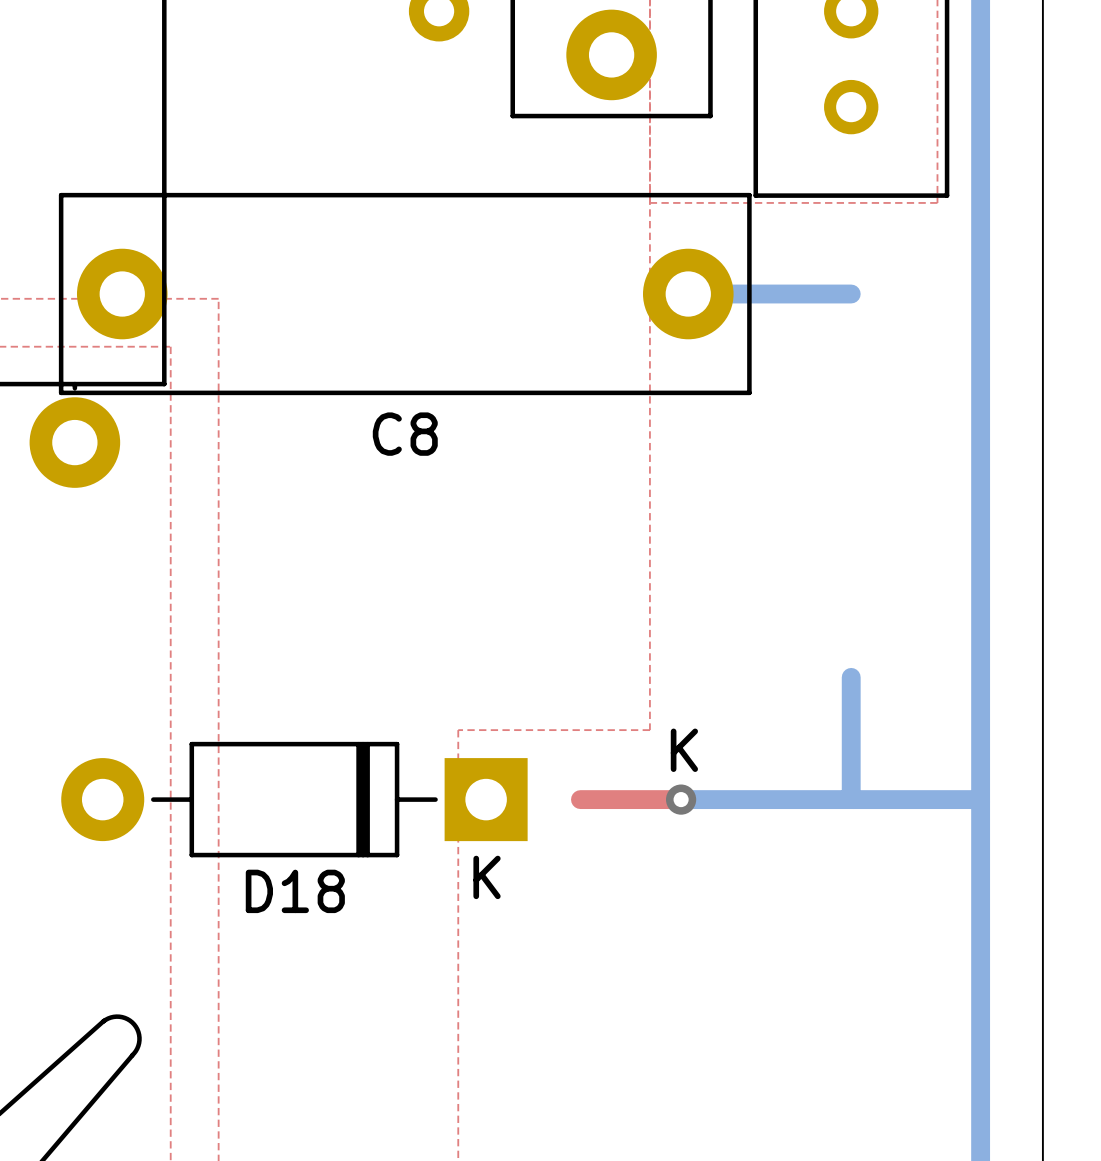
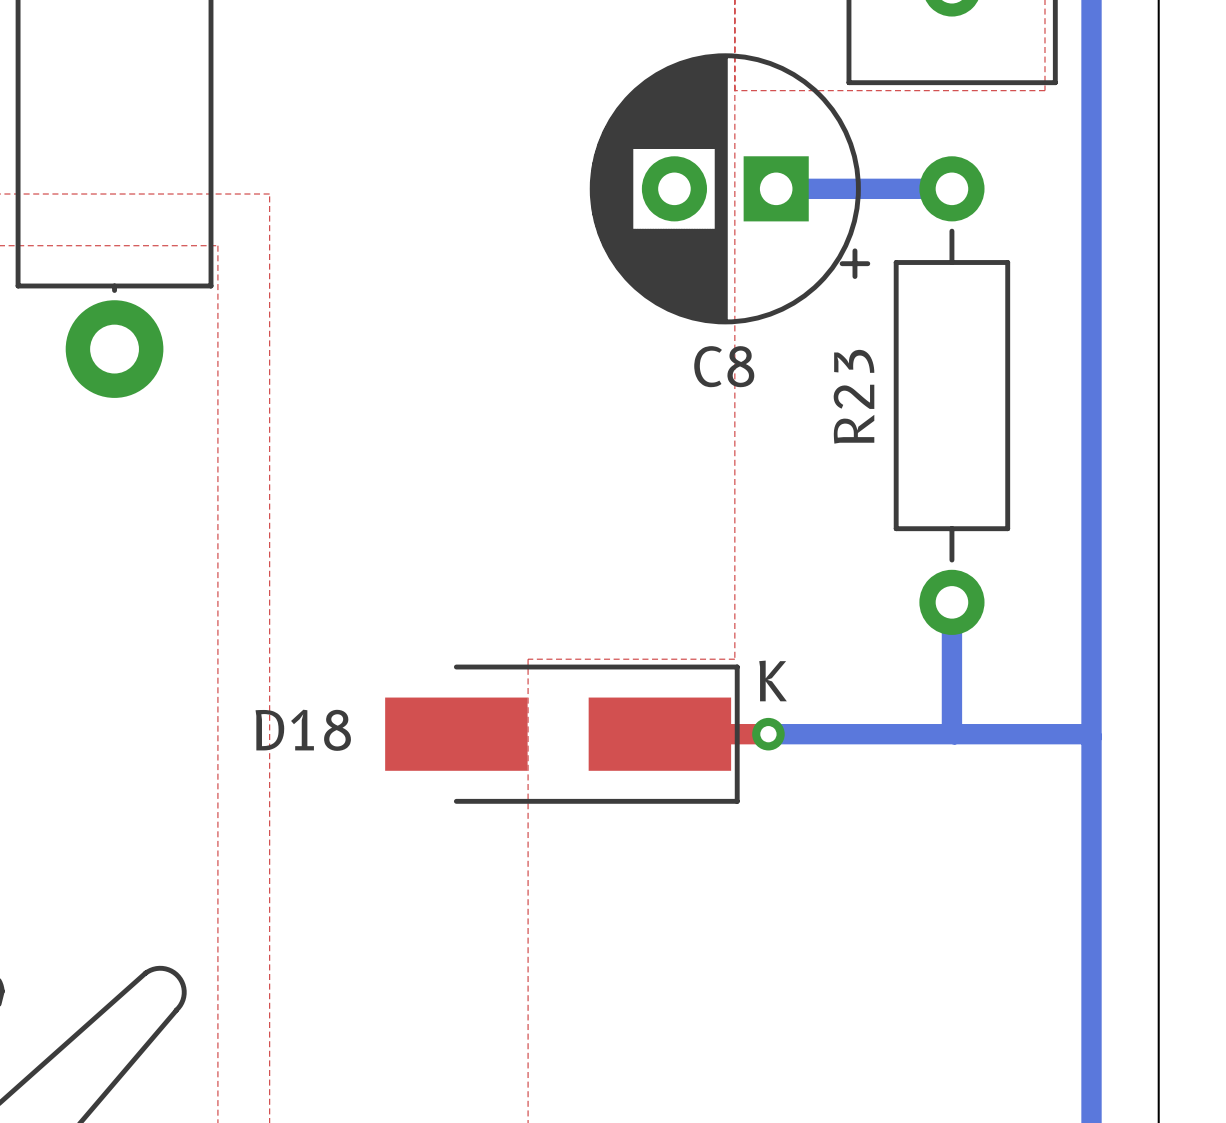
C8 footprint: [58, 192, 752, 396] -> [589, 53, 871, 325]
R23: none -> (951, 395)
D18 footprint: [61, 741, 528, 858] -> [385, 664, 740, 804]
D18 name position: D18 (295, 891) -> D18 (303, 730)

